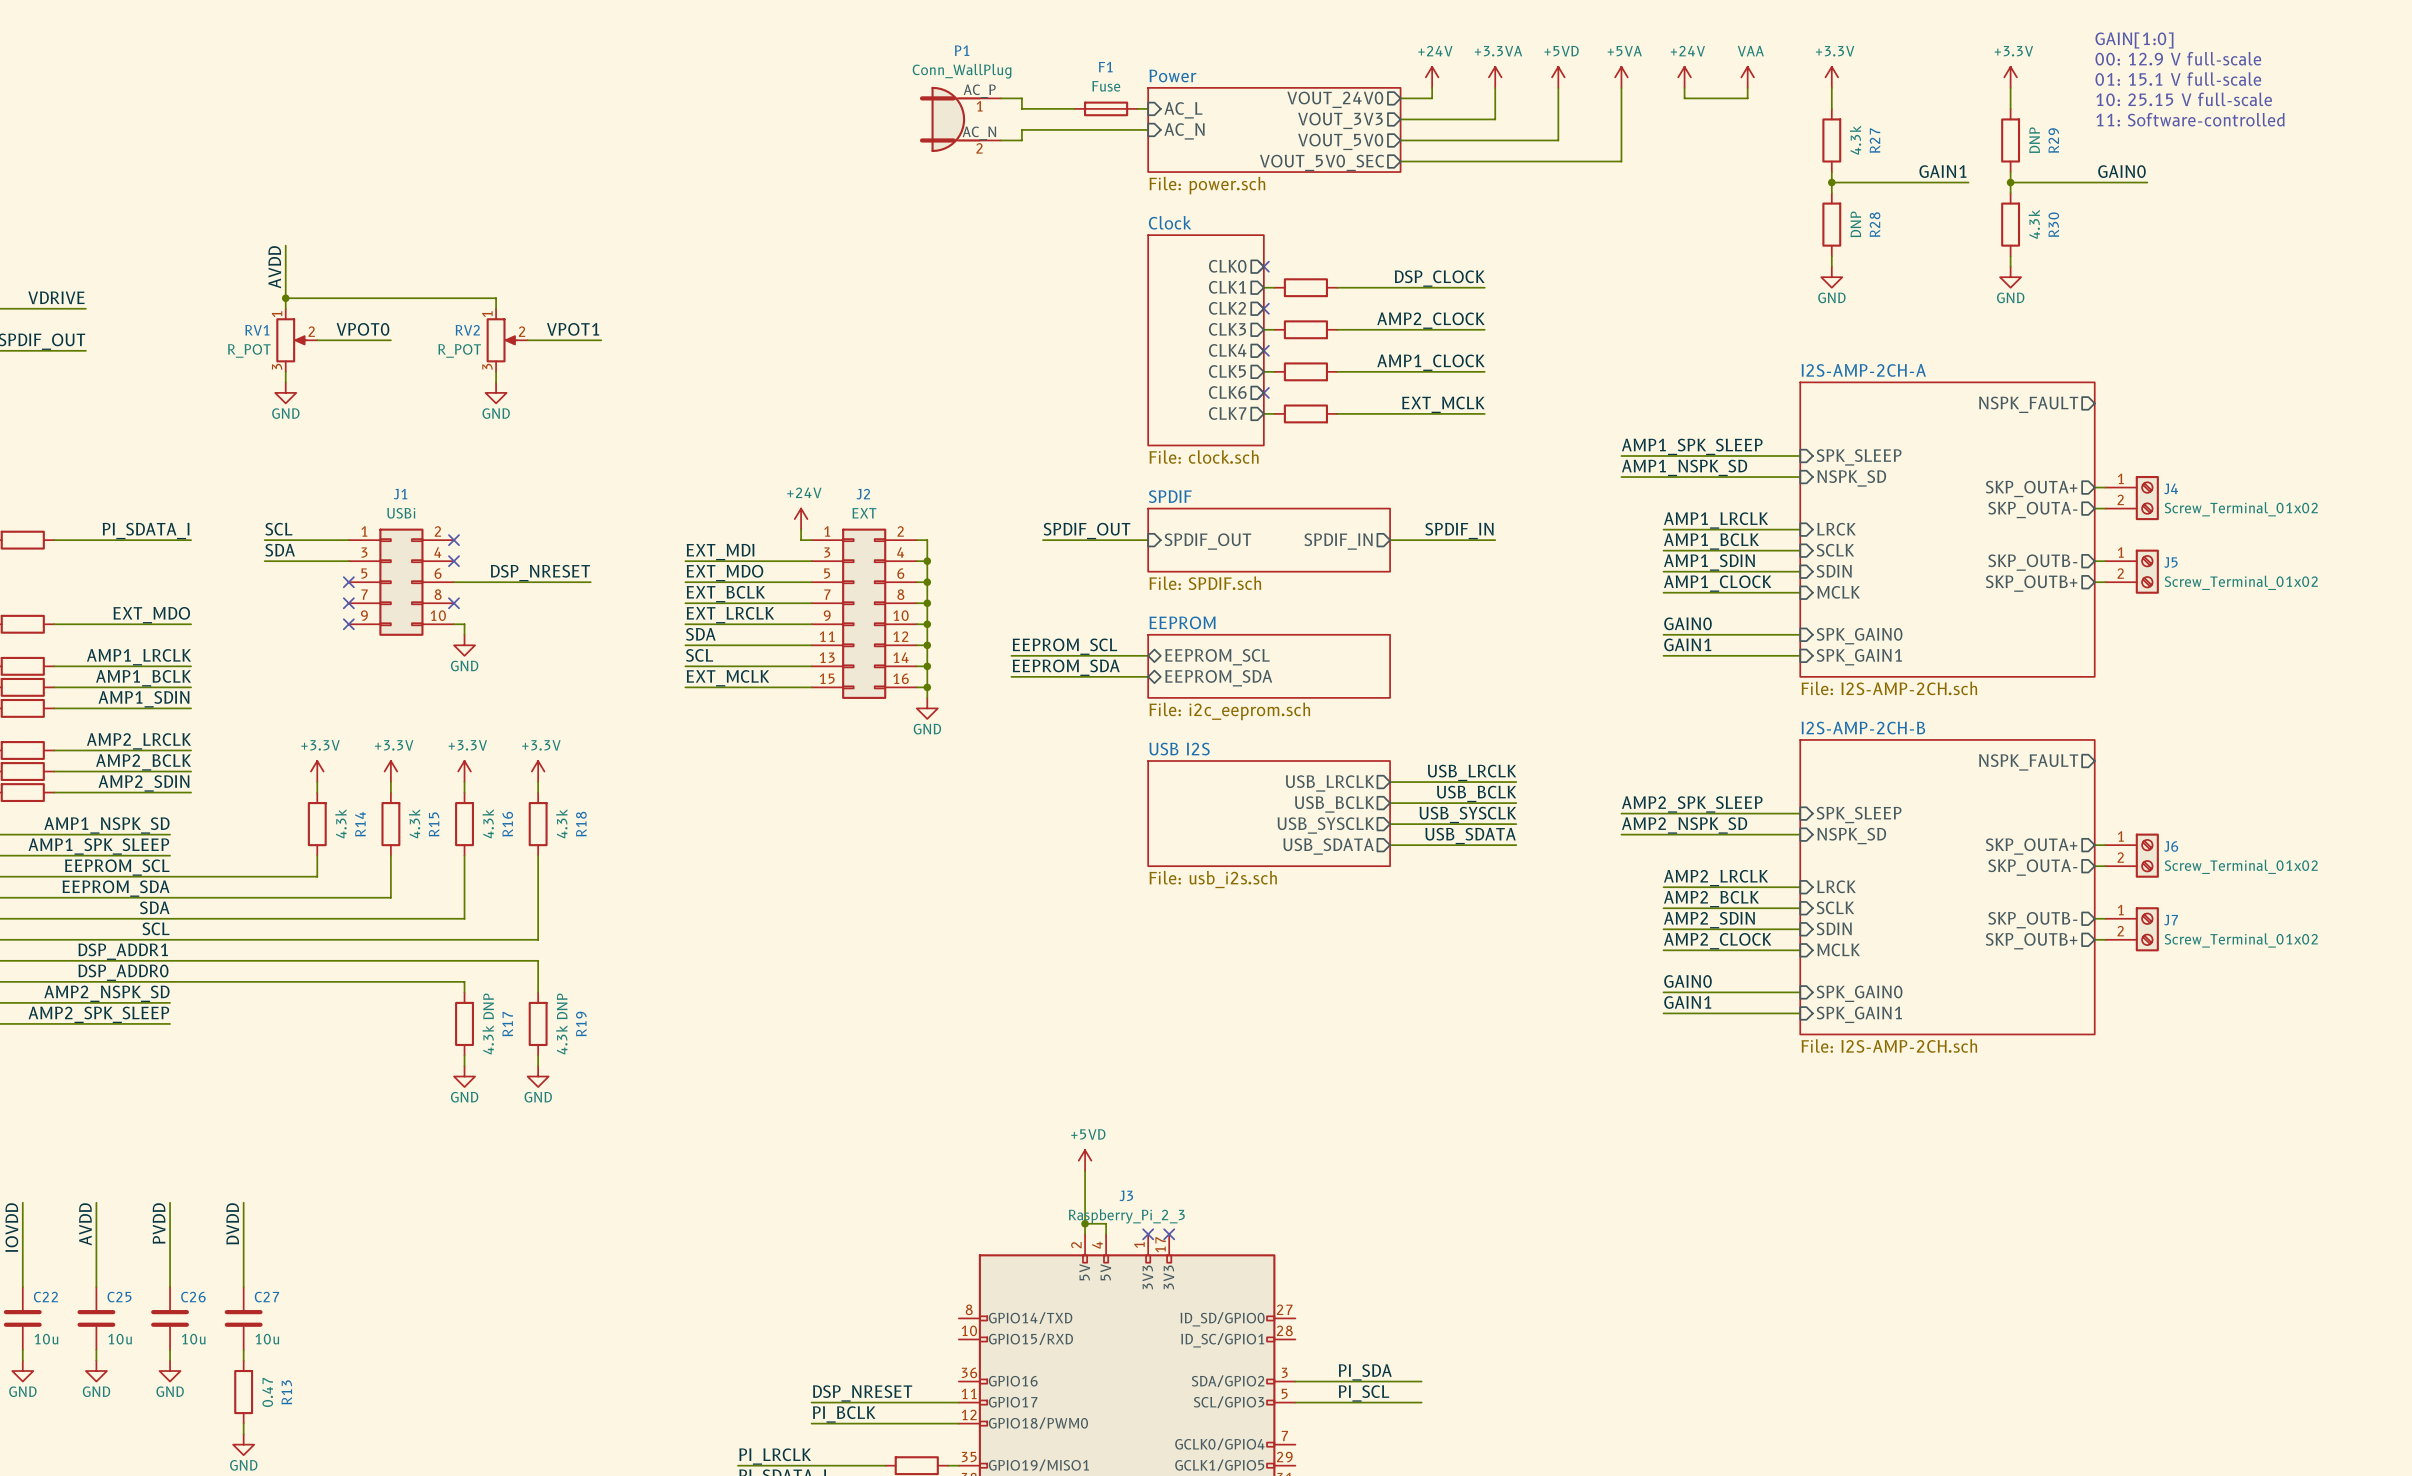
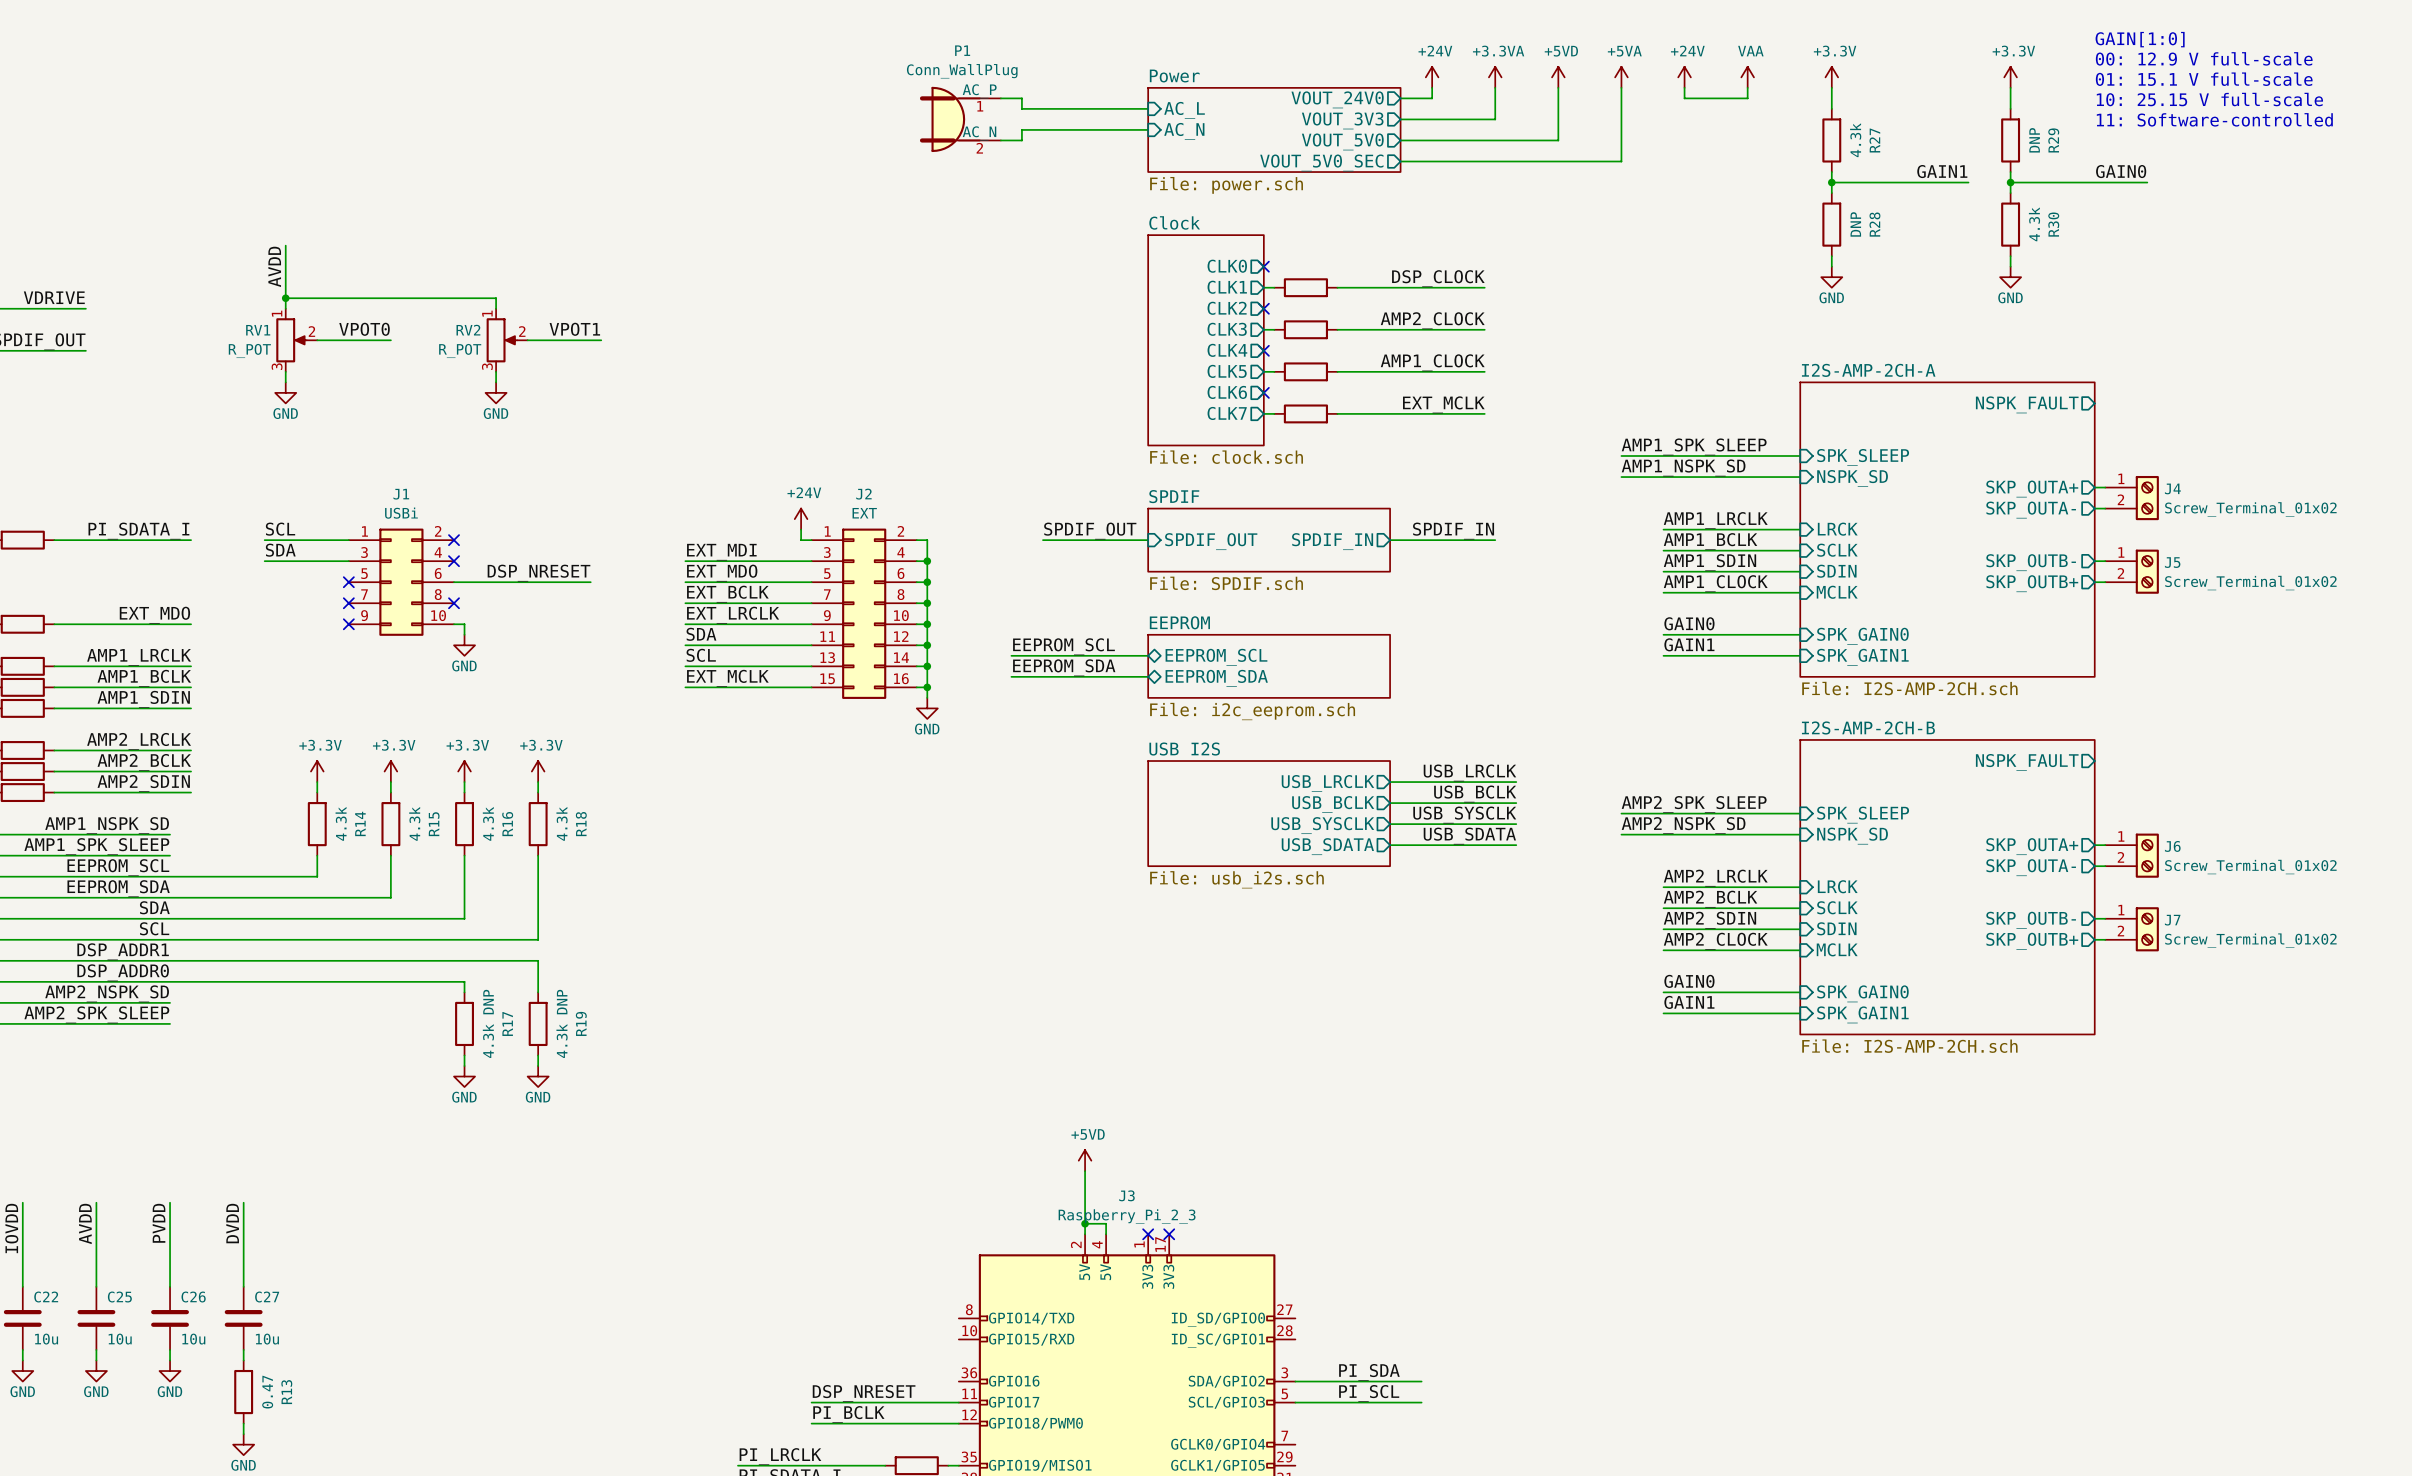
F1: Fuse (1106, 108) -> none

